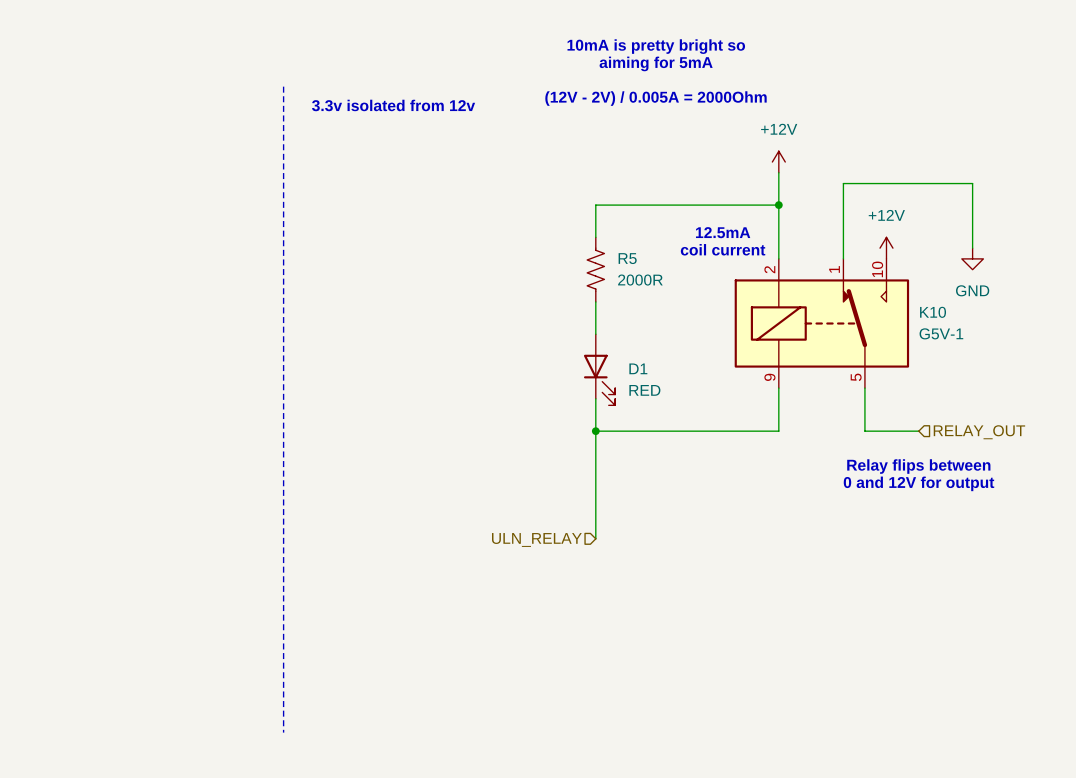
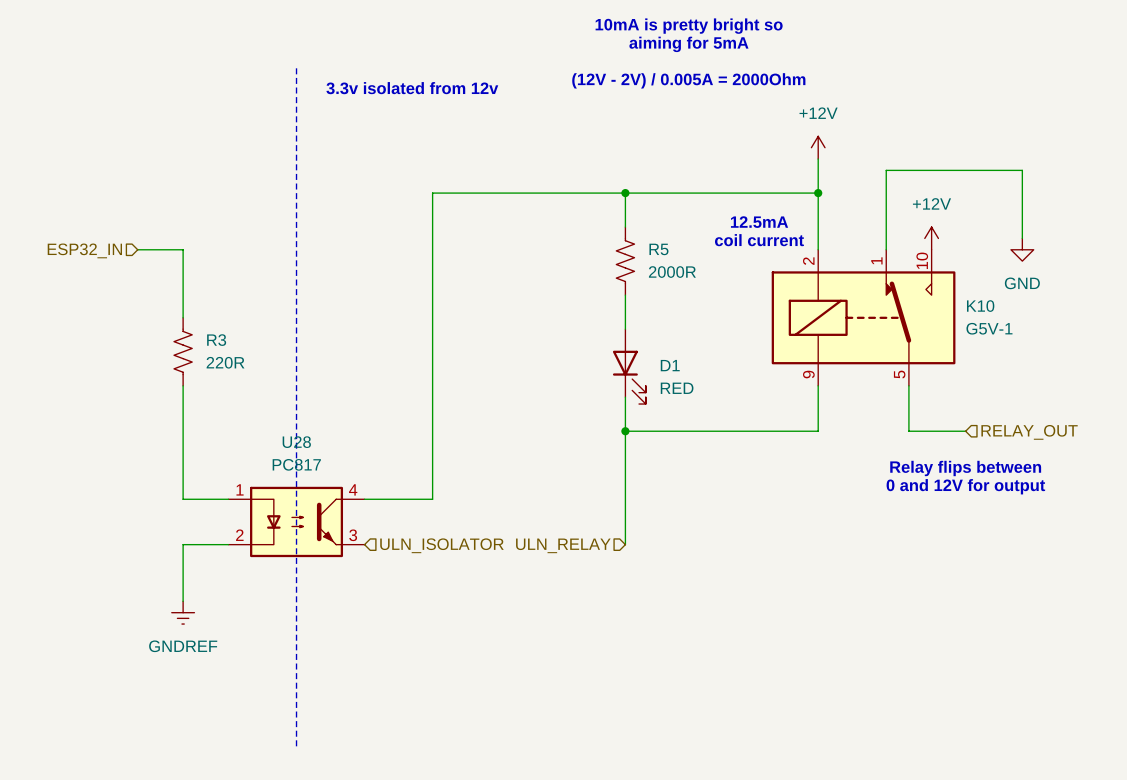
wire: none -> (625, 193) (432, 193) (432, 499) (364, 499)
junction: none -> (625, 193)
wire: none -> (137, 249) (183, 249) (183, 317)
hierarchical label: none -> ESP32_IN (84, 250)
R3: none -> 220R (183, 351)
wire: none -> (183, 385) (183, 499) (228, 499)
U28: none -> PC817 (296, 521)
wire: none -> (228, 544) (183, 544) (183, 601)
hierarchical label: none -> ULN_ISOLATOR (441, 545)
power symbol: none -> GNDREF (183, 612)

